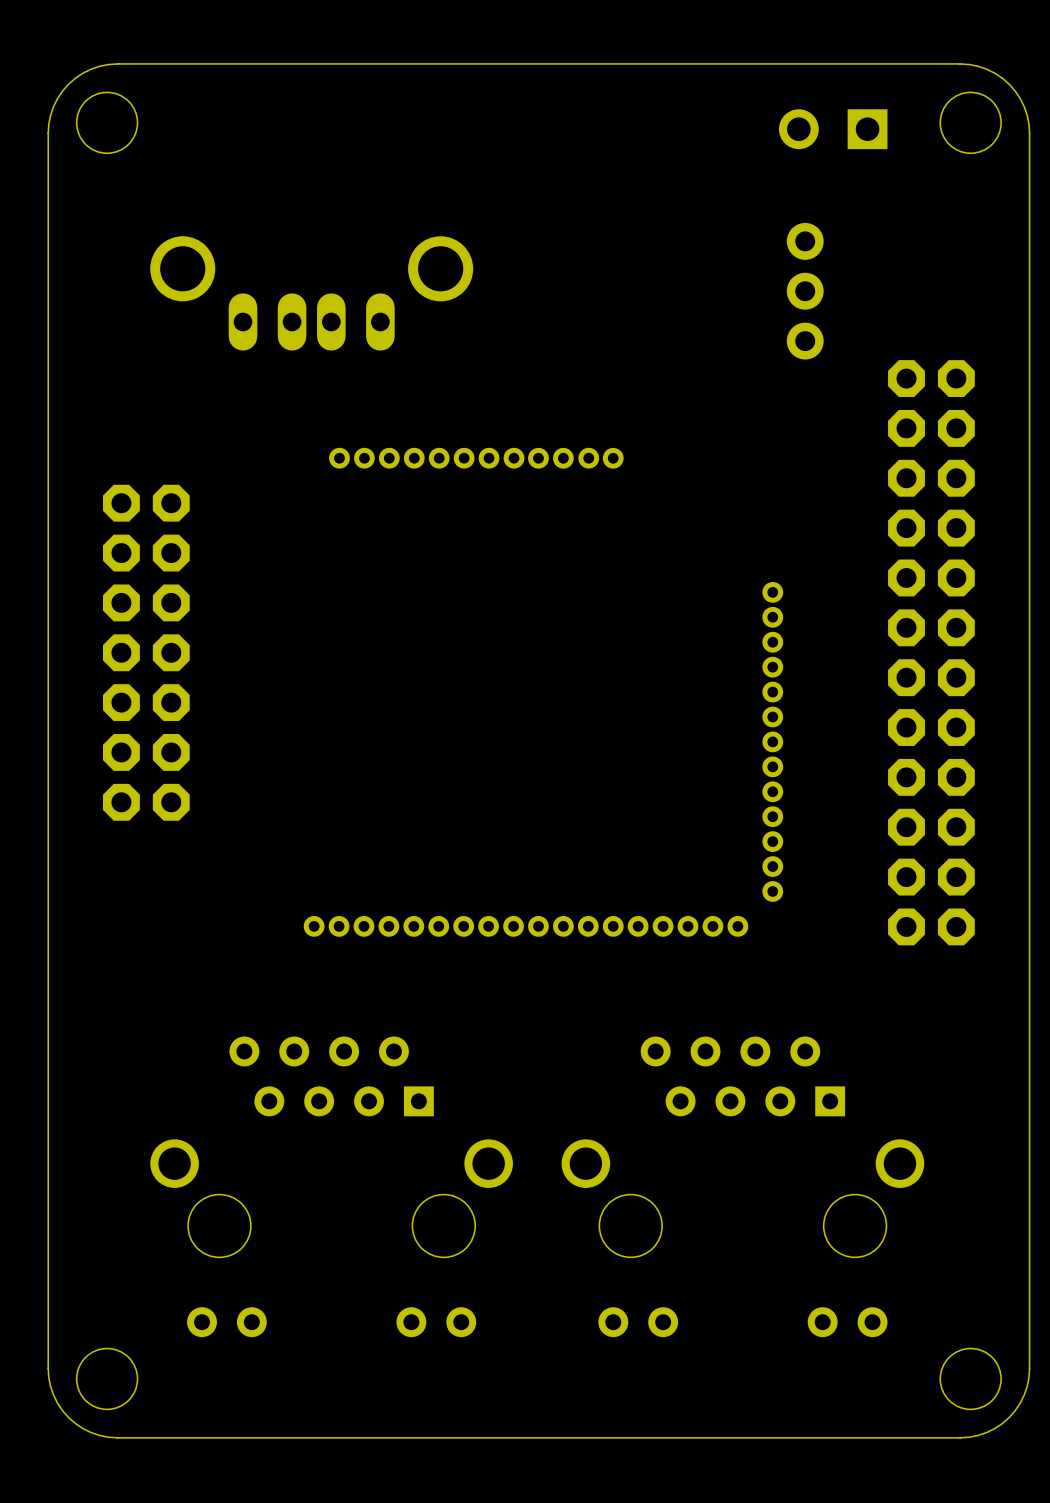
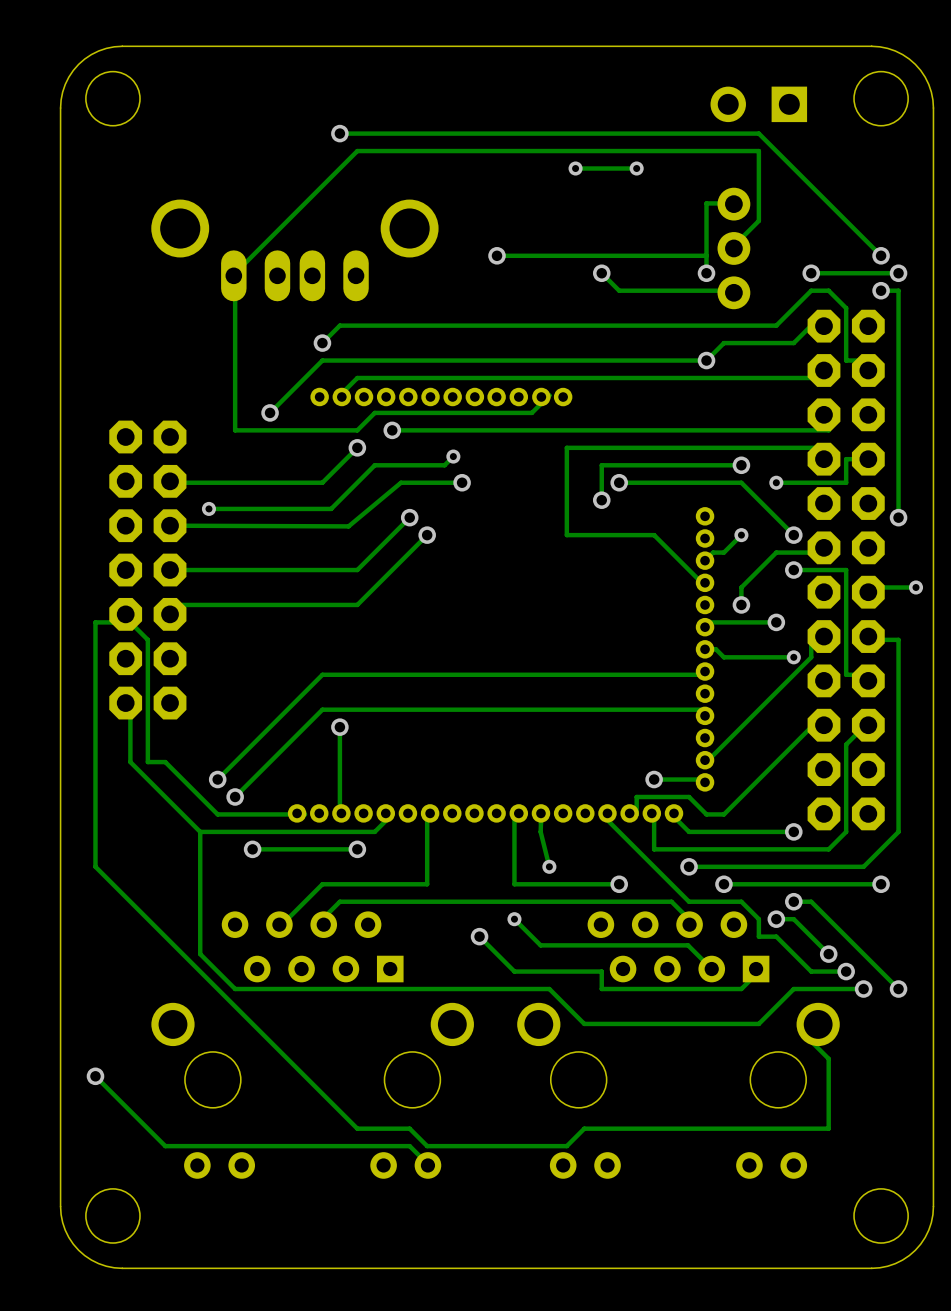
track: none -> (339, 133) (758, 133) (881, 255)
via: none -> (339, 133)
via: none -> (575, 168)
track: none -> (636, 168) (575, 168)
via: none -> (636, 168)
track: none -> (733, 204) (706, 203) (706, 273)
track: none -> (733, 248) (758, 220) (758, 151) (357, 151) (233, 275) (235, 430) (357, 430) (374, 412) (531, 412) (549, 395) (541, 396)
via: none -> (497, 255)
track: none -> (706, 255) (497, 255)
via: none -> (881, 255)
track: none -> (601, 273) (619, 290) (723, 290) (733, 292)
via: none -> (601, 273)
via: none -> (706, 273)
via: none -> (811, 273)
track: none -> (898, 273) (811, 273)
via: none -> (898, 273)
track: none -> (881, 290) (898, 290) (898, 517)
via: none -> (881, 290)
track: none -> (823, 326) (811, 325) (793, 343) (723, 343) (706, 360) (322, 360) (270, 412)
track: none -> (322, 343) (339, 325) (776, 325) (811, 290) (828, 290) (846, 308) (846, 360) (863, 360) (868, 370)
via: none -> (322, 343)
via: none -> (706, 360)
track: none -> (823, 370) (811, 378) (357, 378) (339, 395) (341, 396)
via: none -> (270, 412)
track: none -> (823, 414) (828, 430) (392, 430)
via: none -> (392, 430)
track: none -> (357, 447) (322, 482) (170, 481)
via: none -> (357, 447)
track: none -> (453, 456) (444, 465) (374, 465) (331, 508) (208, 508)
via: none -> (453, 456)
track: none -> (823, 459) (828, 447) (566, 447) (566, 535) (654, 535) (706, 587) (705, 582)
track: none -> (868, 459) (846, 459) (846, 482) (776, 482)
track: none -> (741, 465) (601, 465) (601, 500)
via: none -> (741, 465)
track: none -> (462, 482) (400, 482) (348, 526) (170, 525)
via: none -> (462, 482)
track: none -> (619, 482) (741, 482) (793, 535)
via: none -> (619, 482)
via: none -> (776, 482)
via: none -> (601, 500)
via: none -> (208, 508)
track: none -> (409, 517) (357, 570) (170, 570)
via: none -> (409, 517)
via: none -> (898, 517)
track: none -> (427, 535) (357, 604) (182, 604) (170, 614)
via: none -> (427, 535)
track: none -> (741, 535) (723, 552) (713, 552) (705, 560)
via: none -> (741, 535)
via: none -> (793, 535)
track: none -> (823, 547) (819, 552) (776, 552) (741, 587) (741, 604)
track: none -> (793, 570) (846, 570) (846, 674) (863, 674) (868, 680)
via: none -> (793, 570)
track: none -> (915, 587) (881, 587) (868, 592)
via: none -> (915, 587)
via: none -> (741, 604)
track: none -> (776, 622) (706, 622) (705, 627)
via: none -> (776, 622)
track: none -> (823, 636) (811, 639) (811, 657) (706, 762) (705, 760)
track: none -> (868, 636) (881, 639) (898, 639) (898, 831) (863, 866) (689, 866)
track: none -> (705, 649) (715, 649) (723, 657) (793, 657)
via: none -> (793, 657)
track: none -> (705, 671) (706, 674) (322, 674) (217, 779)
track: none -> (125, 703) (130, 709) (130, 762) (200, 831)
track: none -> (705, 715) (706, 709) (322, 709) (235, 796)
track: none -> (823, 725) (811, 727) (723, 814) (706, 814) (689, 796) (636, 796) (636, 814) (629, 813)
track: none -> (868, 725) (863, 727) (846, 744) (846, 831) (828, 849) (654, 849) (654, 814) (651, 813)
track: none -> (339, 727) (339, 814) (341, 813)
via: none -> (339, 727)
via: none -> (217, 779)
track: none -> (654, 779) (706, 779) (705, 782)
via: none -> (654, 779)
via: none -> (235, 796)
track: none -> (297, 813) (304, 814) (217, 814) (165, 762) (147, 762) (147, 639) (130, 622) (125, 614) (112, 622) (95, 622) (95, 866) (357, 1128) (409, 1128) (427, 1146) (566, 1146) (584, 1128) (828, 1128) (828, 1058) (811, 1041) (818, 1024)
track: none -> (385, 813) (392, 814) (374, 831) (200, 831)
track: none -> (430, 813) (427, 814) (427, 884) (322, 884) (287, 919) (279, 924)
track: none -> (518, 813) (514, 814) (514, 884) (619, 884)
track: none -> (540, 813) (540, 831) (549, 866)
track: none -> (607, 813) (601, 814) (689, 901) (741, 901) (758, 919) (758, 936) (776, 936) (811, 971) (846, 971)
track: none -> (673, 813) (671, 814) (689, 831) (793, 831)
track: none -> (200, 831) (200, 954) (235, 989) (549, 989) (584, 1023) (758, 1023) (793, 989) (863, 989)
via: none -> (793, 831)
via: none -> (252, 849)
track: none -> (357, 849) (252, 849)
via: none -> (357, 849)
via: none -> (549, 866)
via: none -> (689, 866)
via: none -> (619, 884)
via: none -> (723, 884)
track: none -> (881, 884) (723, 884)
via: none -> (881, 884)
track: none -> (793, 901) (811, 901) (898, 989)
via: none -> (793, 901)
track: none -> (514, 919) (540, 945) (688, 945) (711, 969)
via: none -> (514, 919)
track: none -> (776, 919) (793, 919) (828, 954)
via: none -> (776, 919)
track: none -> (689, 924) (689, 919) (671, 901) (339, 901) (322, 919) (323, 924)
track: none -> (479, 936) (514, 971) (601, 971) (601, 989) (741, 989) (758, 971) (756, 969)
via: none -> (479, 936)
via: none -> (828, 954)
via: none -> (846, 971)
via: none -> (863, 989)
via: none -> (898, 989)
track: none -> (95, 1076) (165, 1146) (409, 1146) (427, 1165)
via: none -> (95, 1076)

